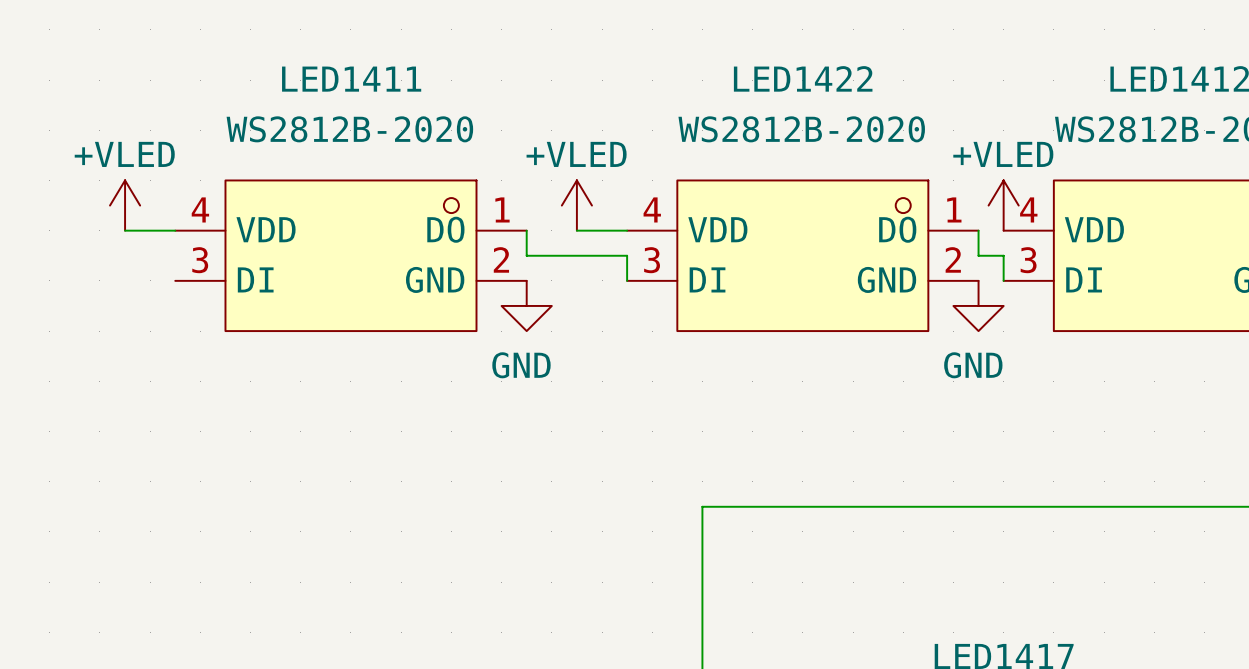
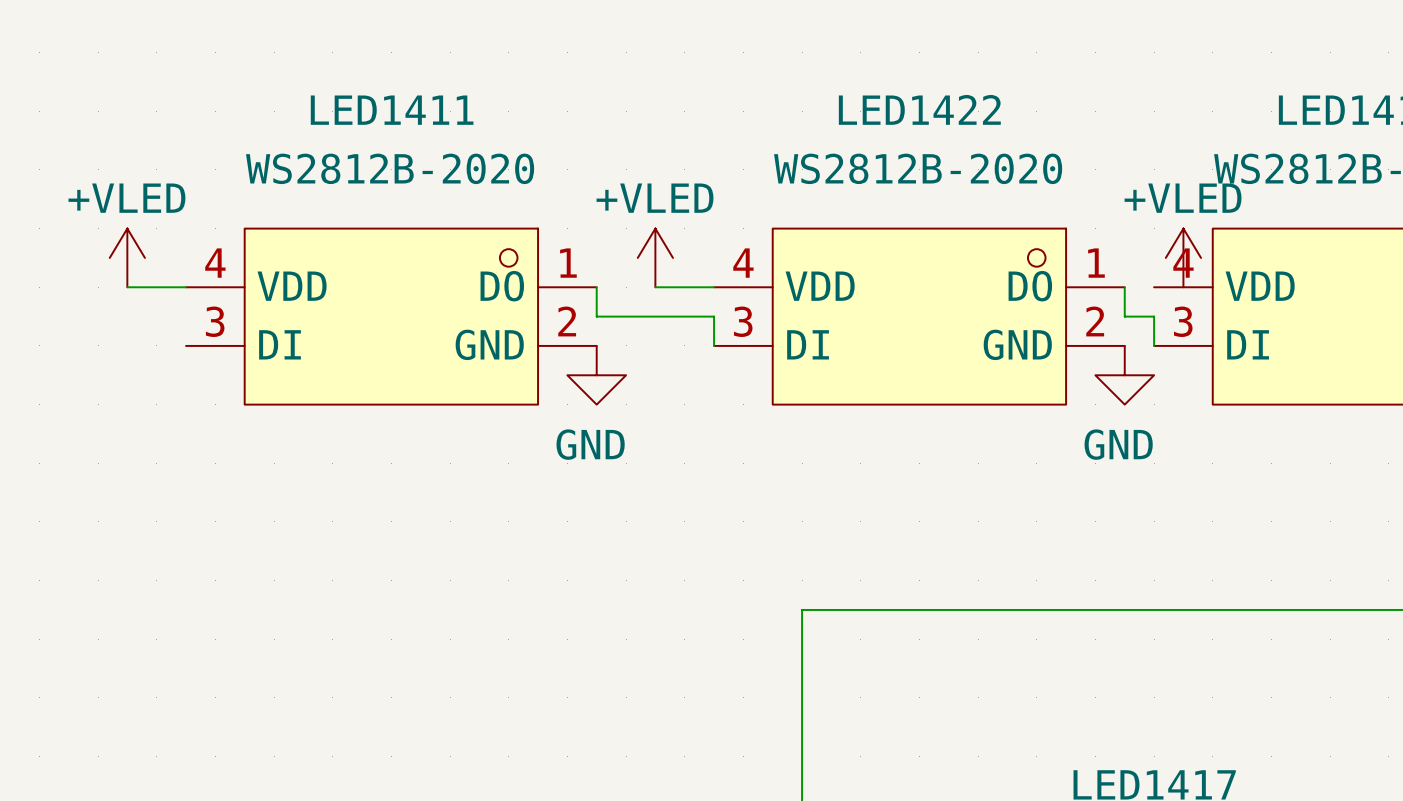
power symbol position: +VLED (1003, 205) -> +VLED (1183, 257)

